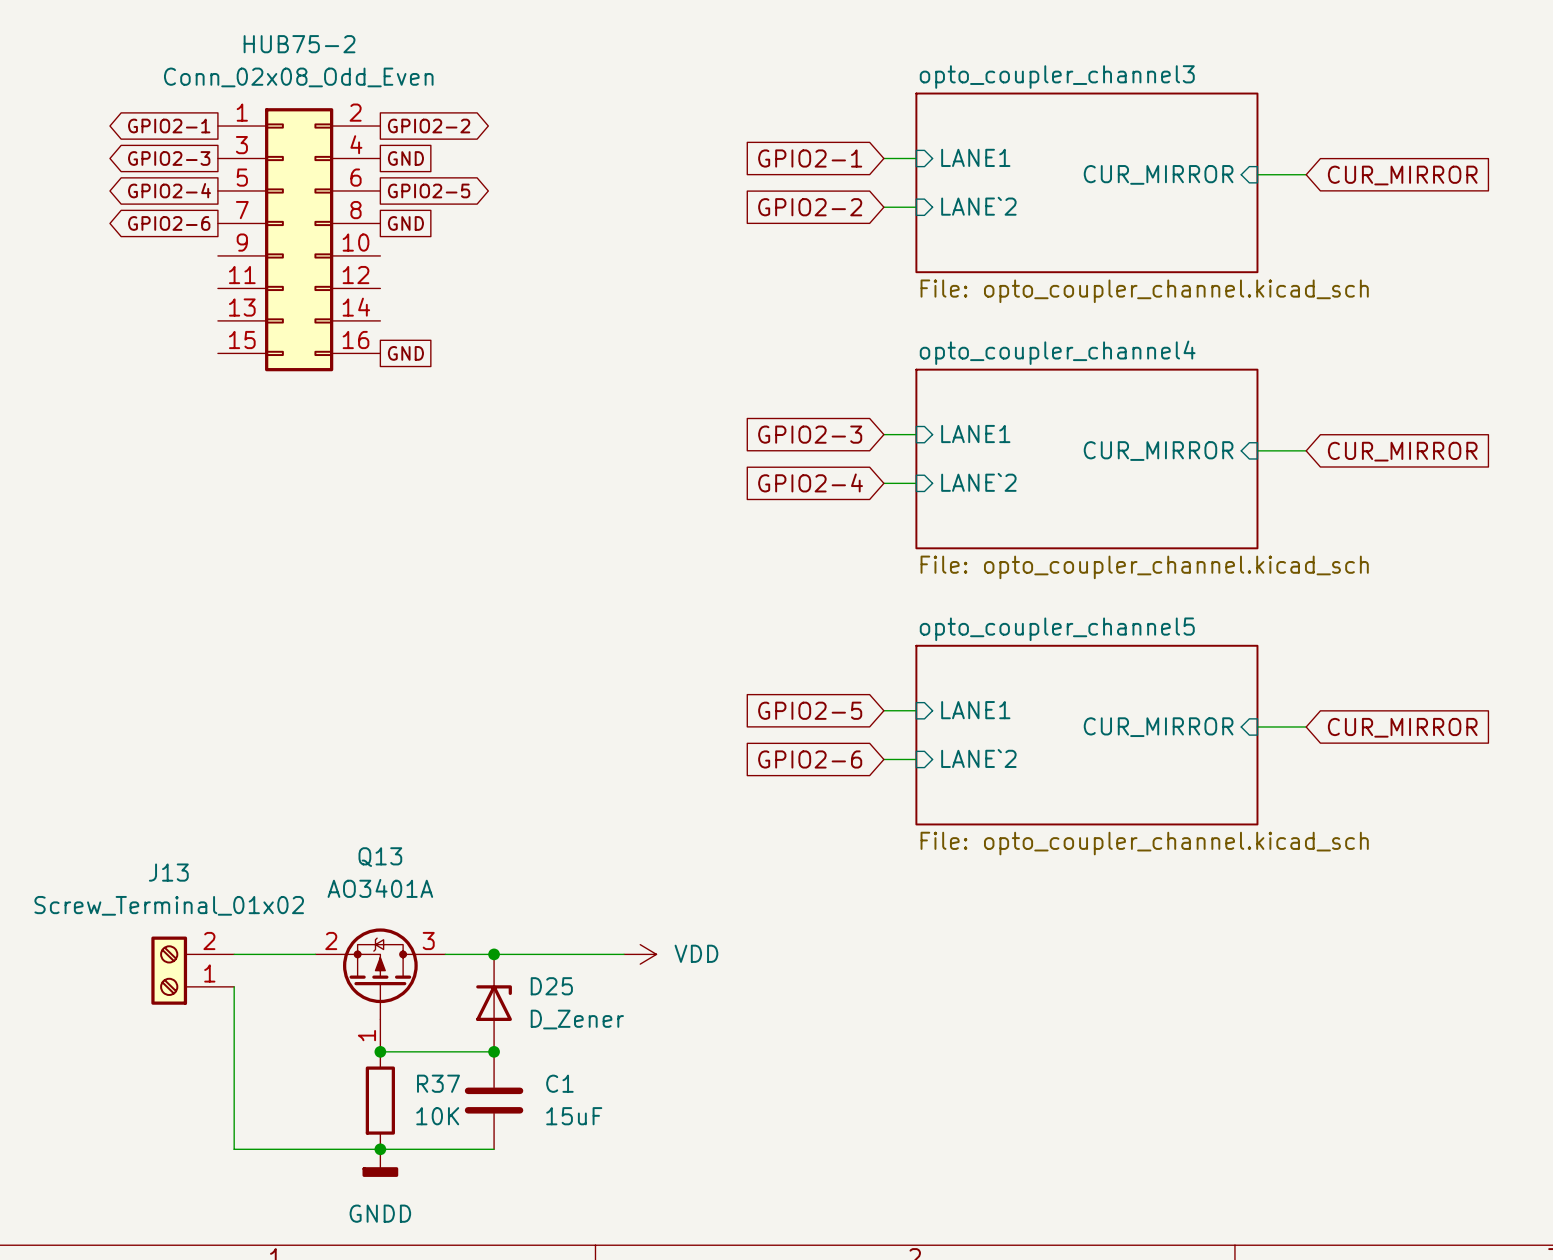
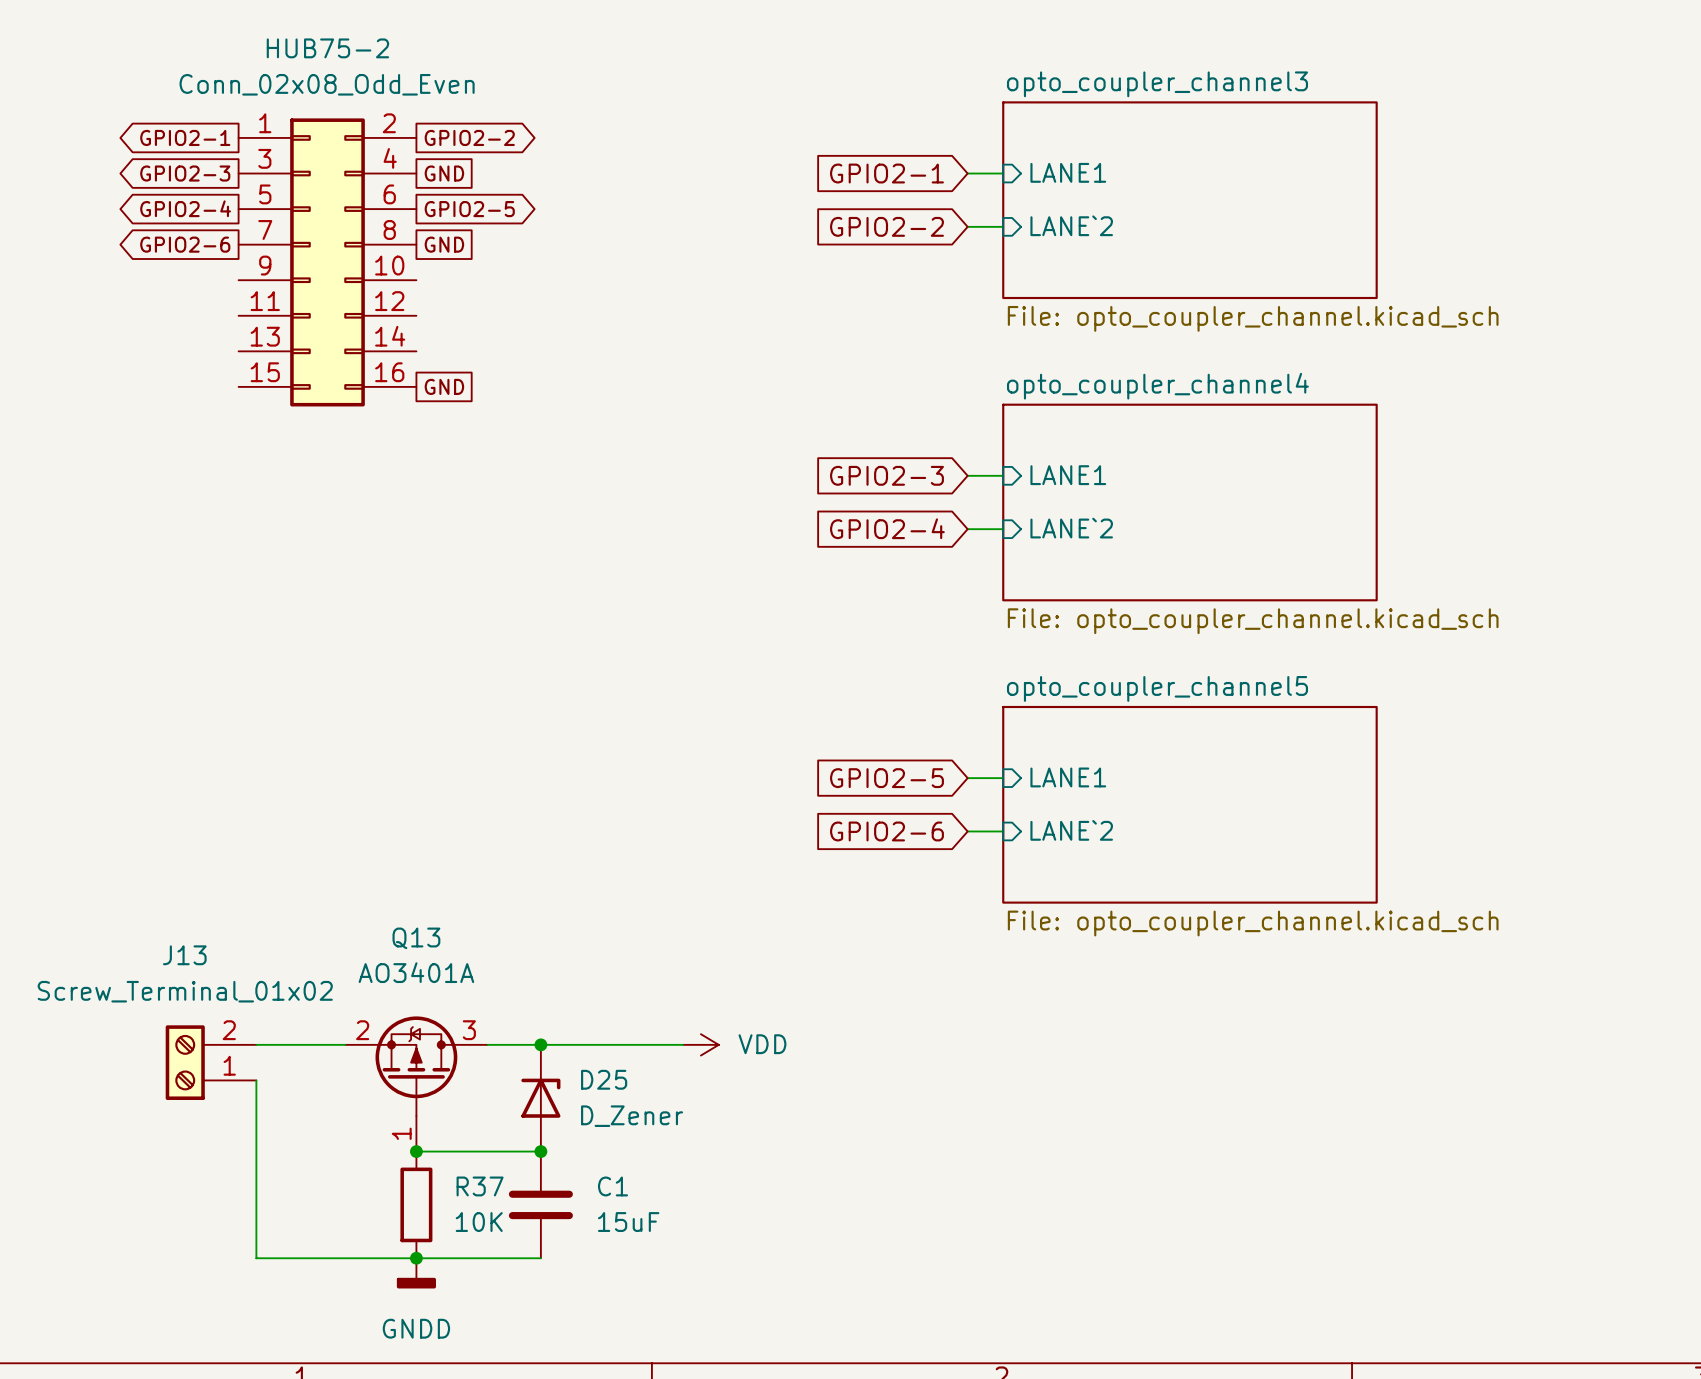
sheet pin: CUR_MIRROR (1158, 174) -> none
wire: (1257, 174) (1306, 174) -> none
global label: CUR_MIRROR (1402, 175) -> none
wire: (1257, 450) (1306, 450) -> none
sheet pin: CUR_MIRROR (1158, 451) -> none
global label: CUR_MIRROR (1402, 451) -> none
wire: (1257, 726) (1306, 726) -> none
sheet pin: CUR_MIRROR (1158, 727) -> none
global label: CUR_MIRROR (1402, 727) -> none

